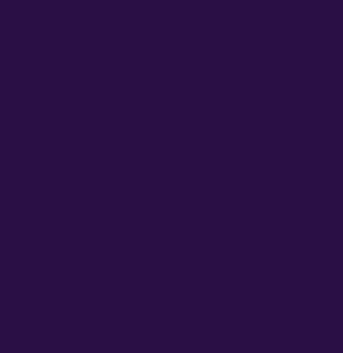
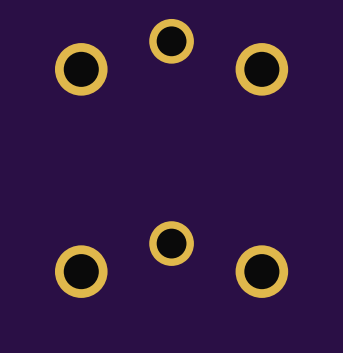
part: none -> (171, 57)
part: none -> (171, 259)

